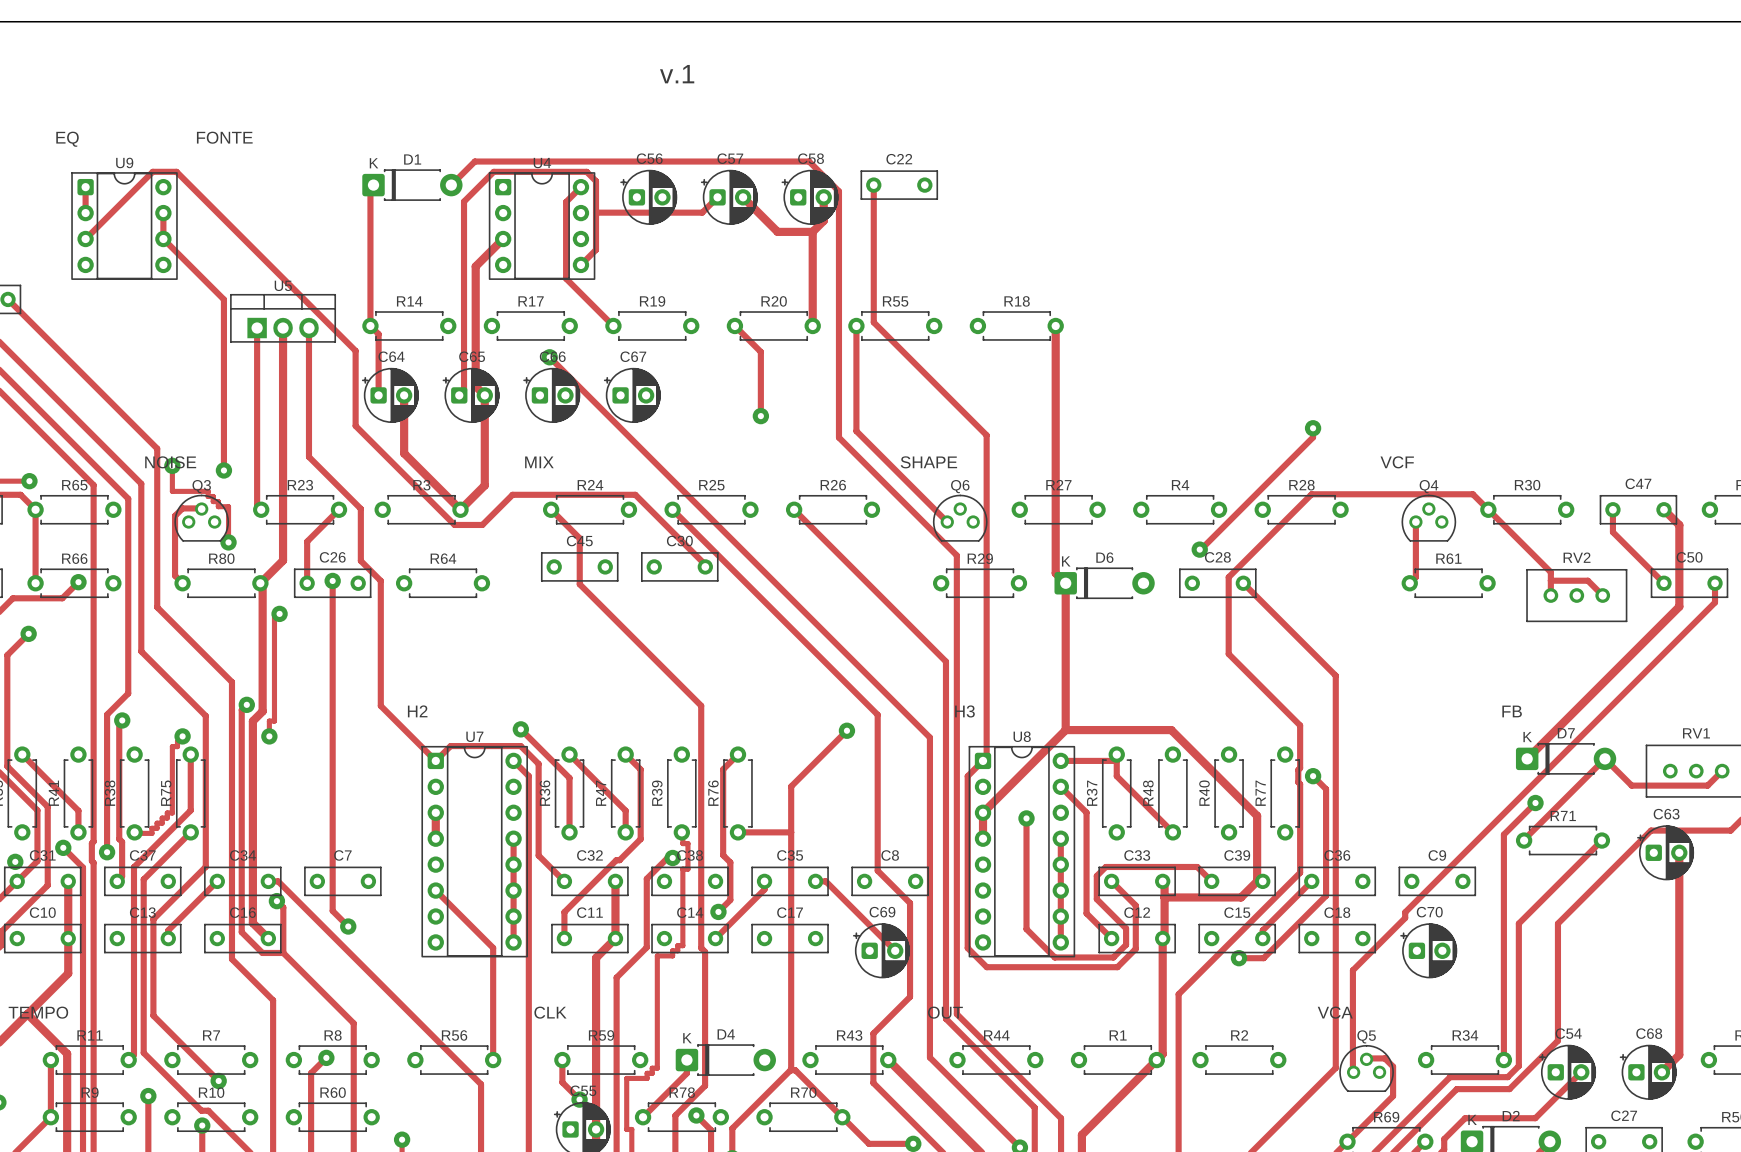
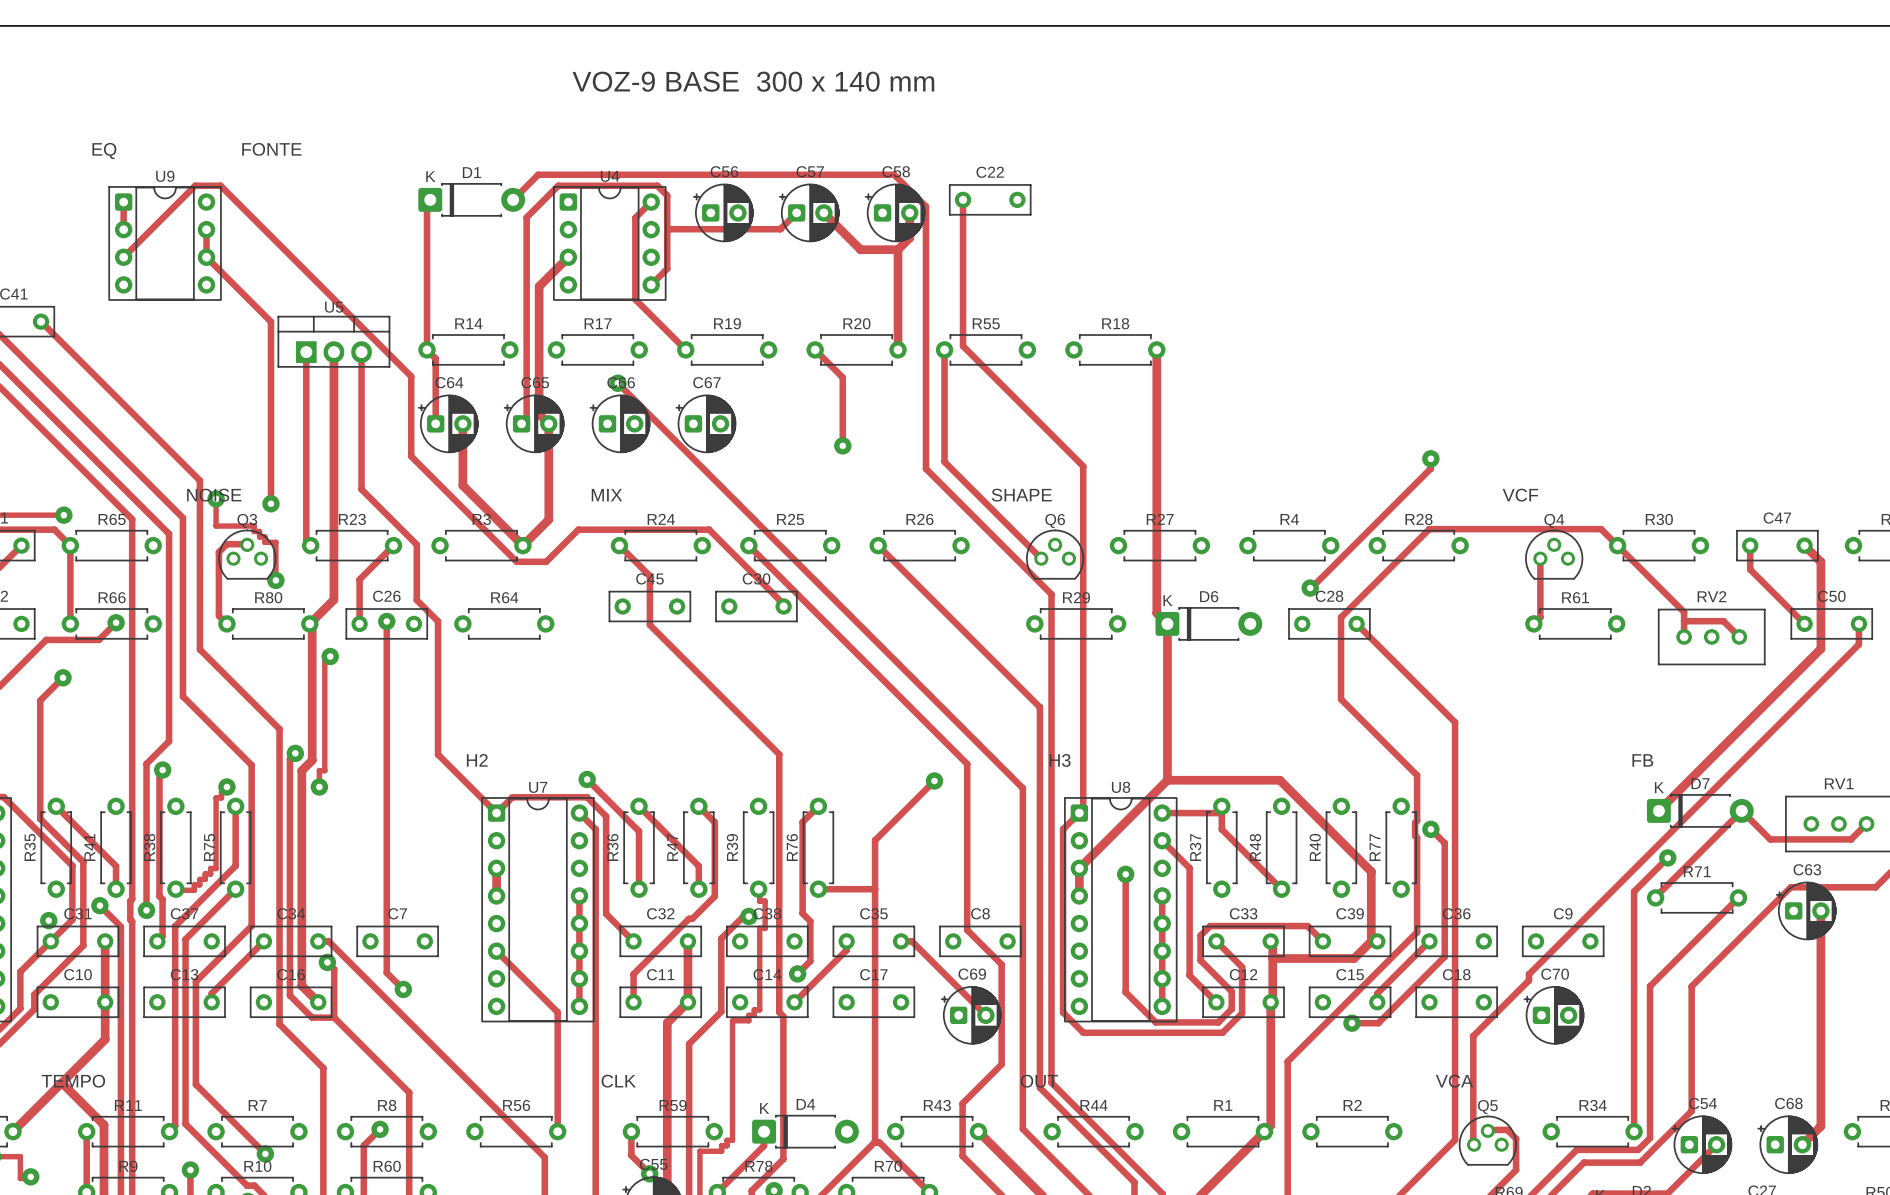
text: v.1 (677, 74) -> VOZ-9 BASE 300 x 140 mm (753, 81)

